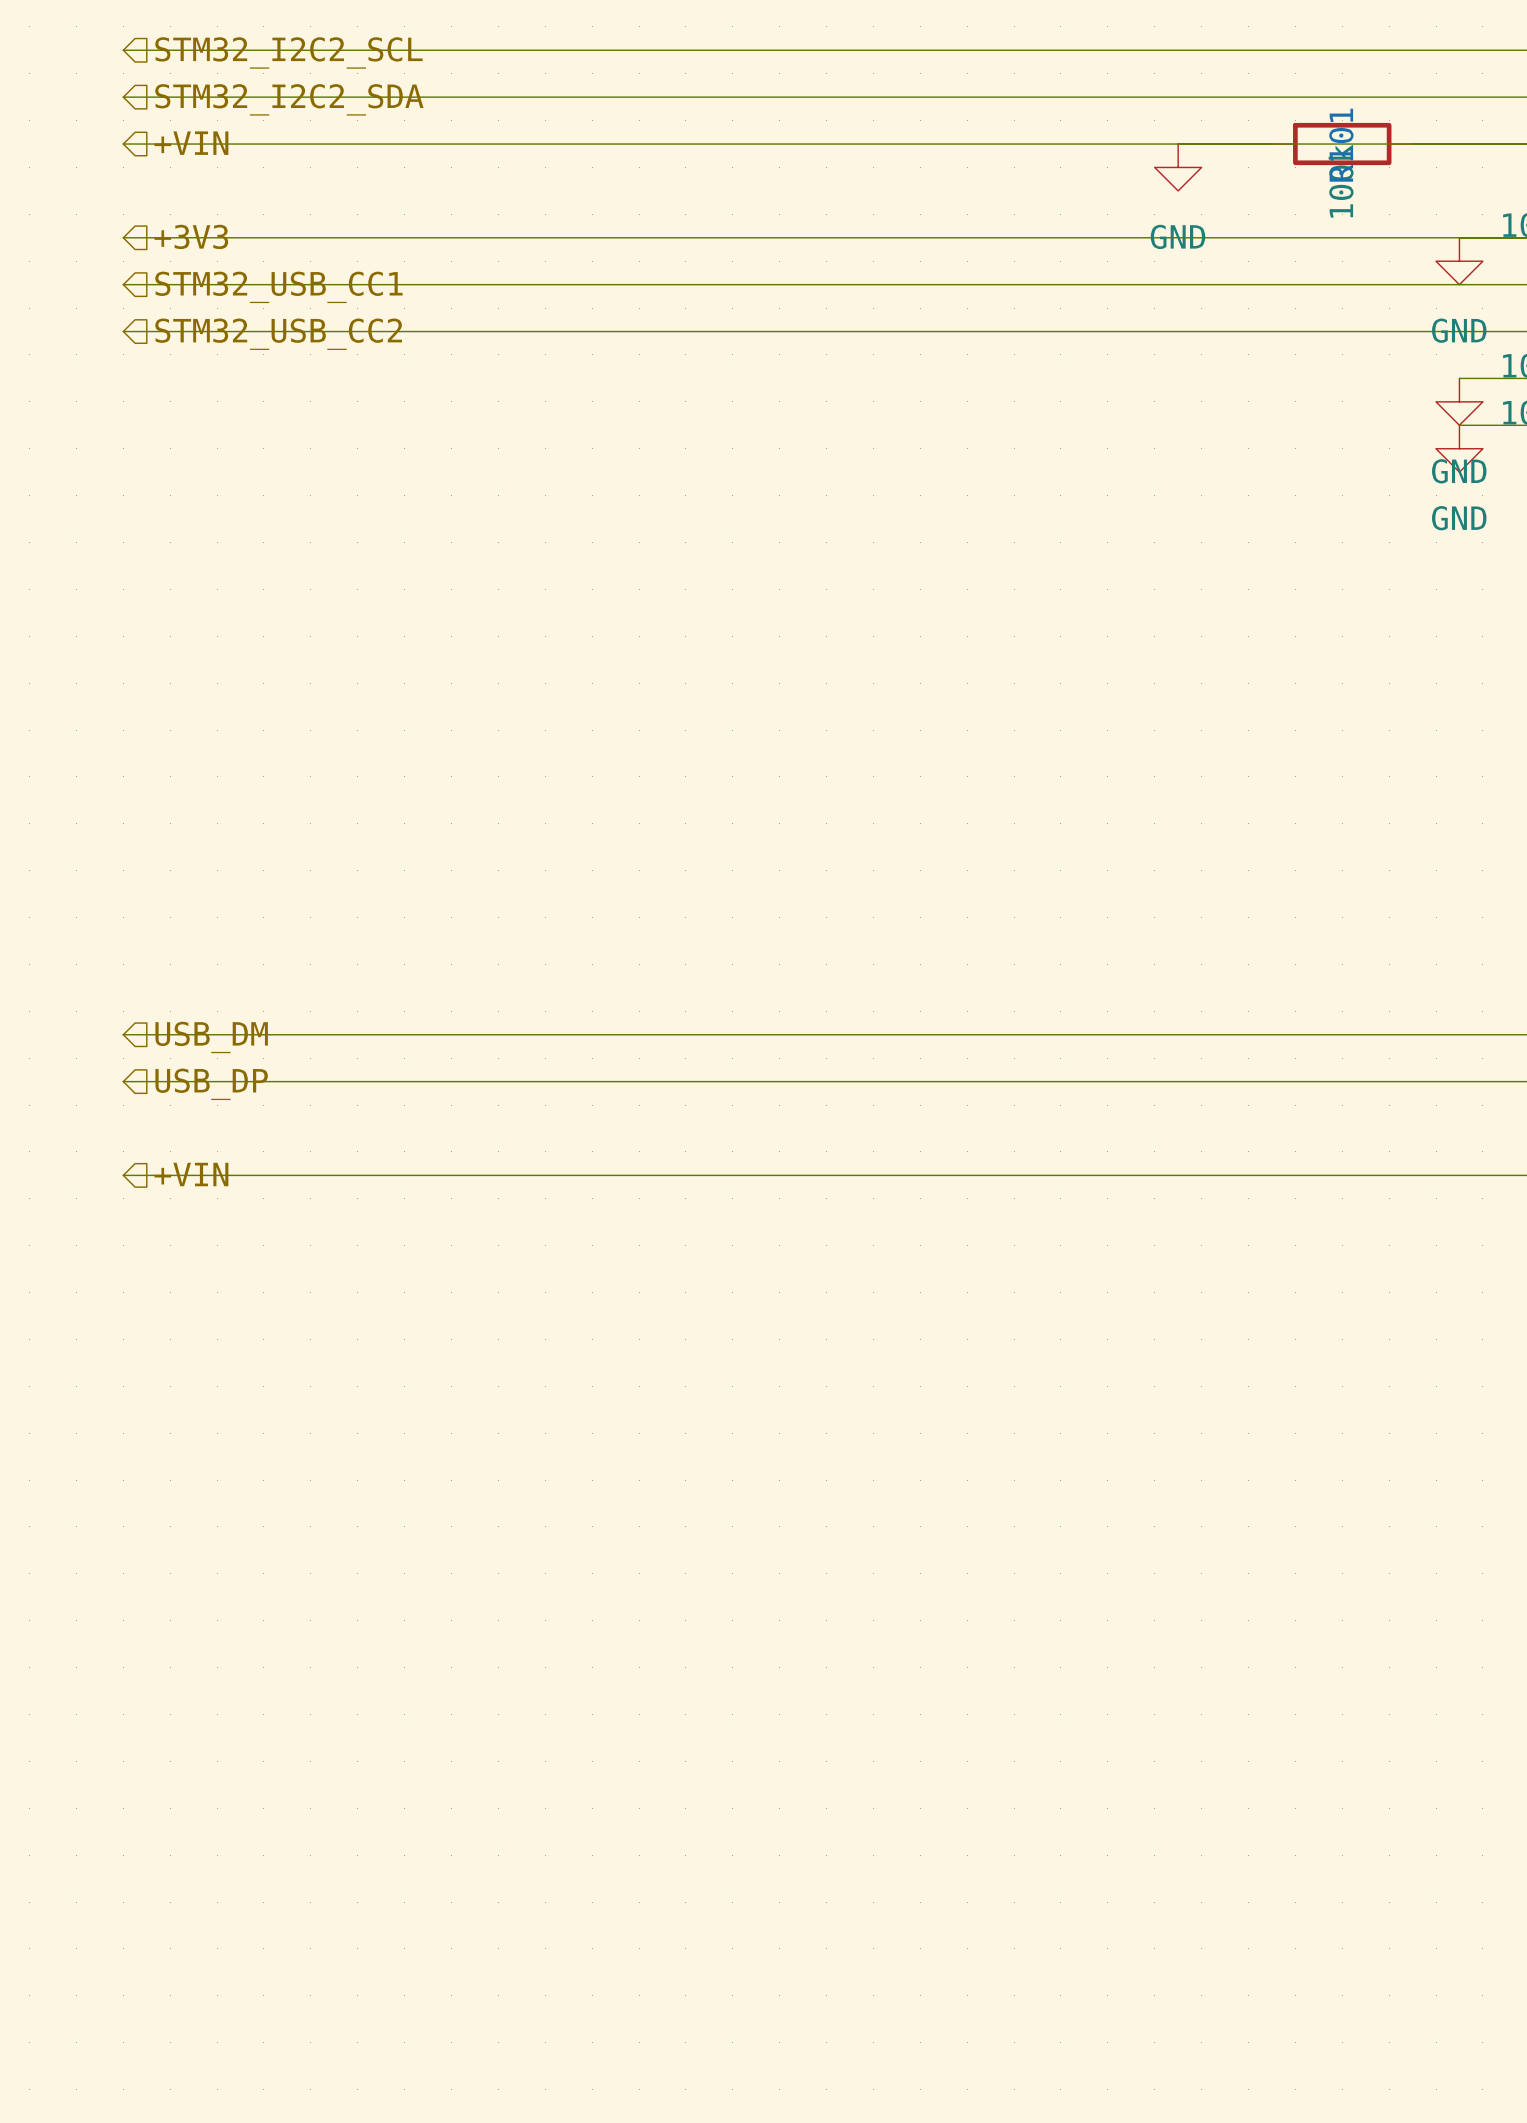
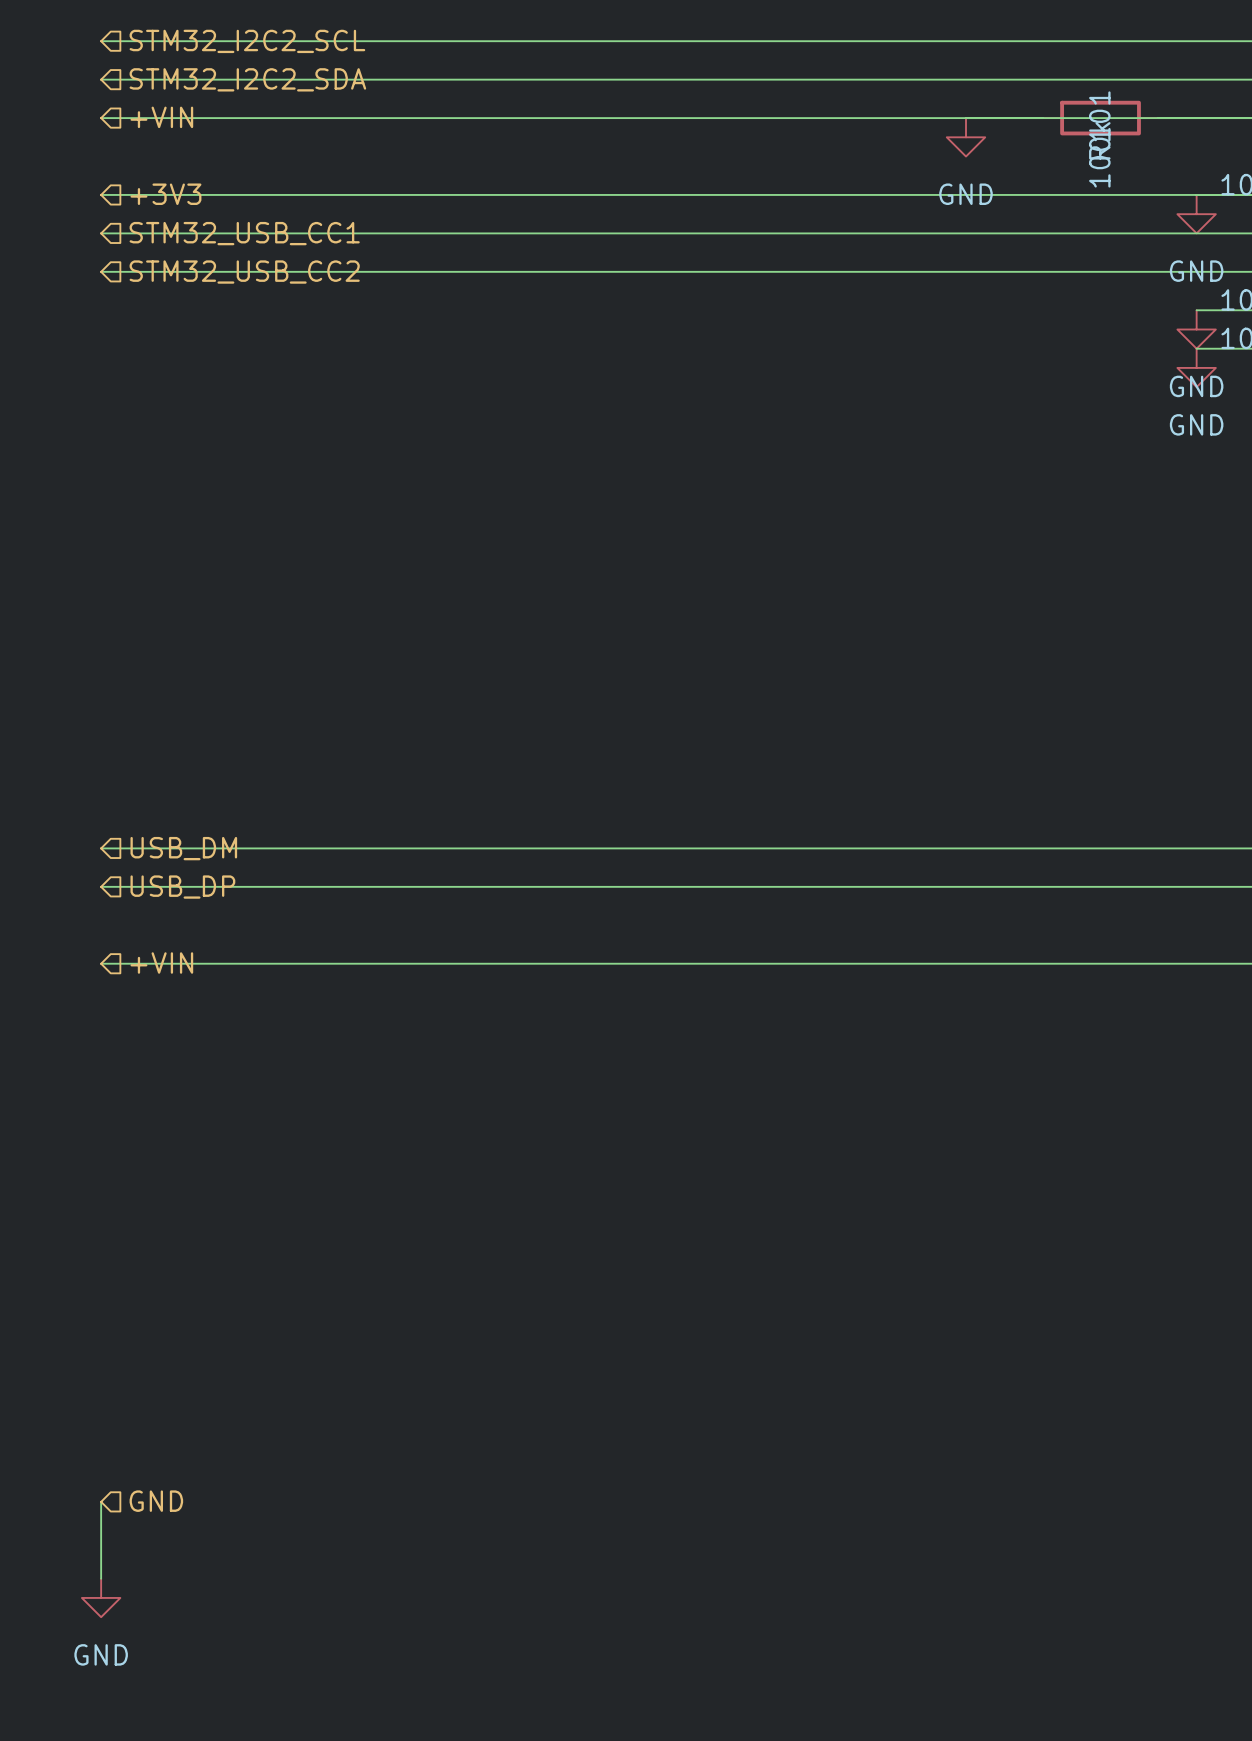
hierarchical label: none -> GND (156, 1501)
wire: none -> (101, 1501) (101, 1578)
power symbol: none -> GND (101, 1597)

